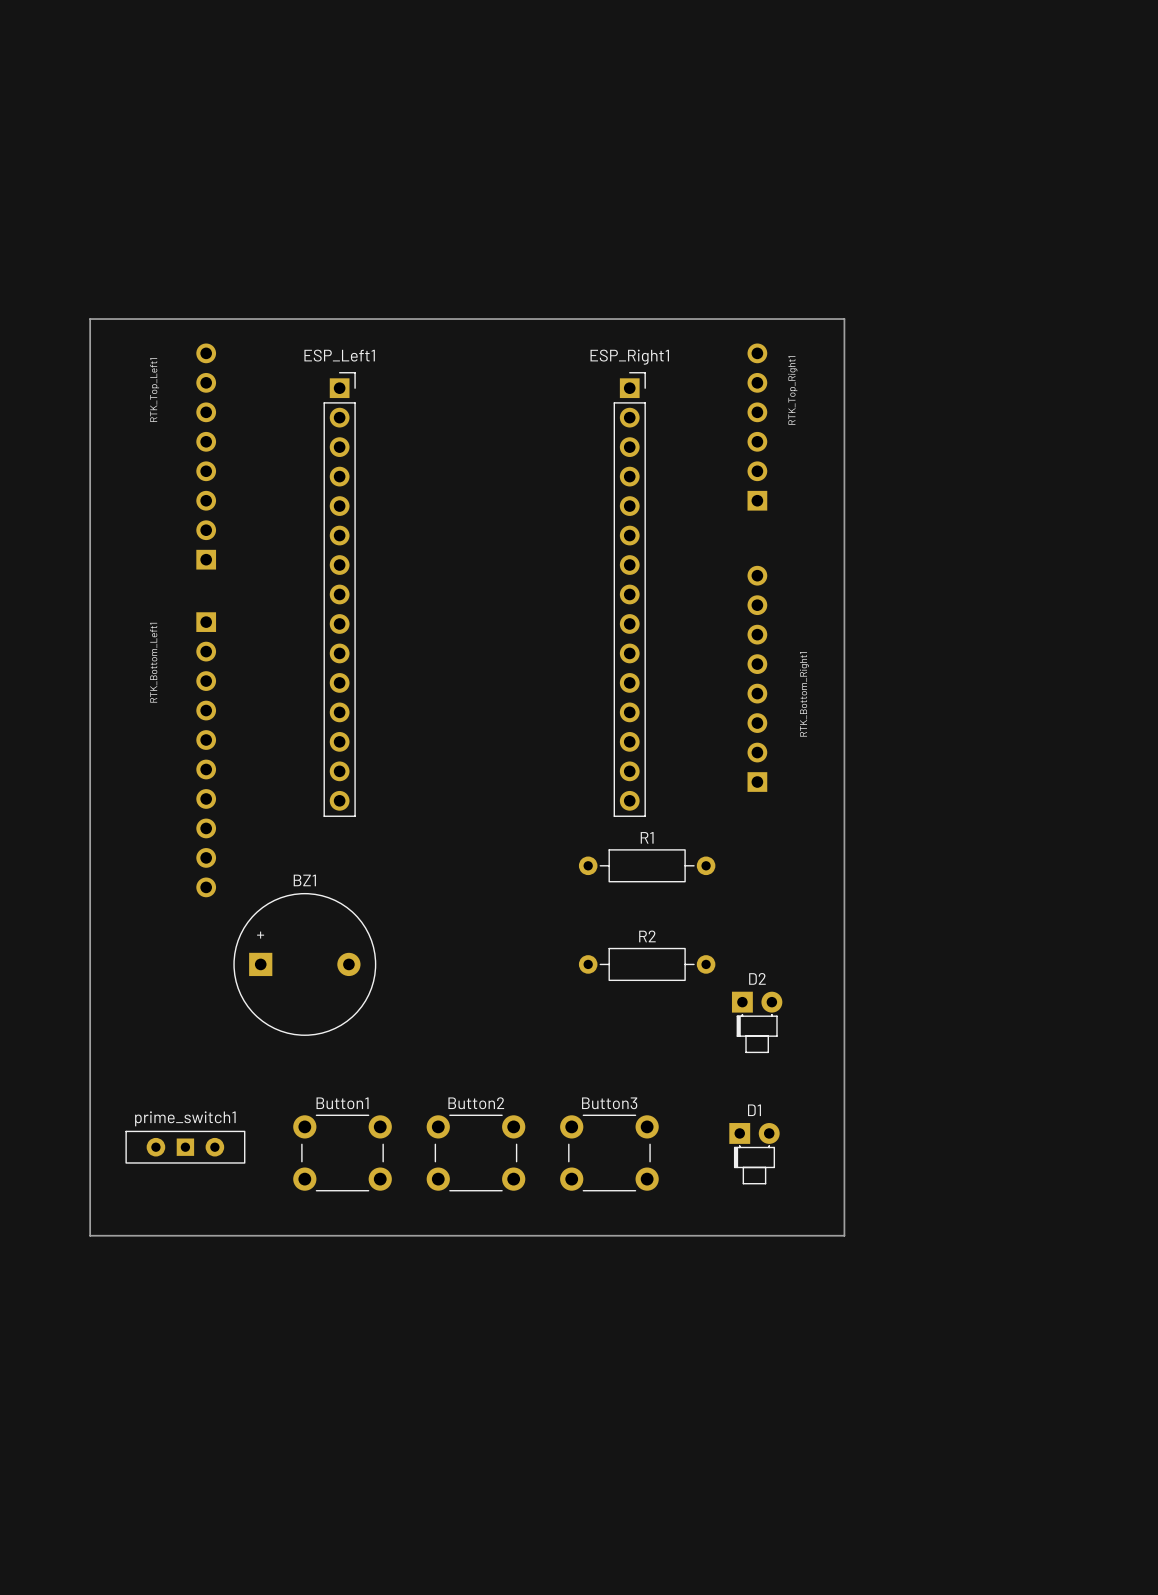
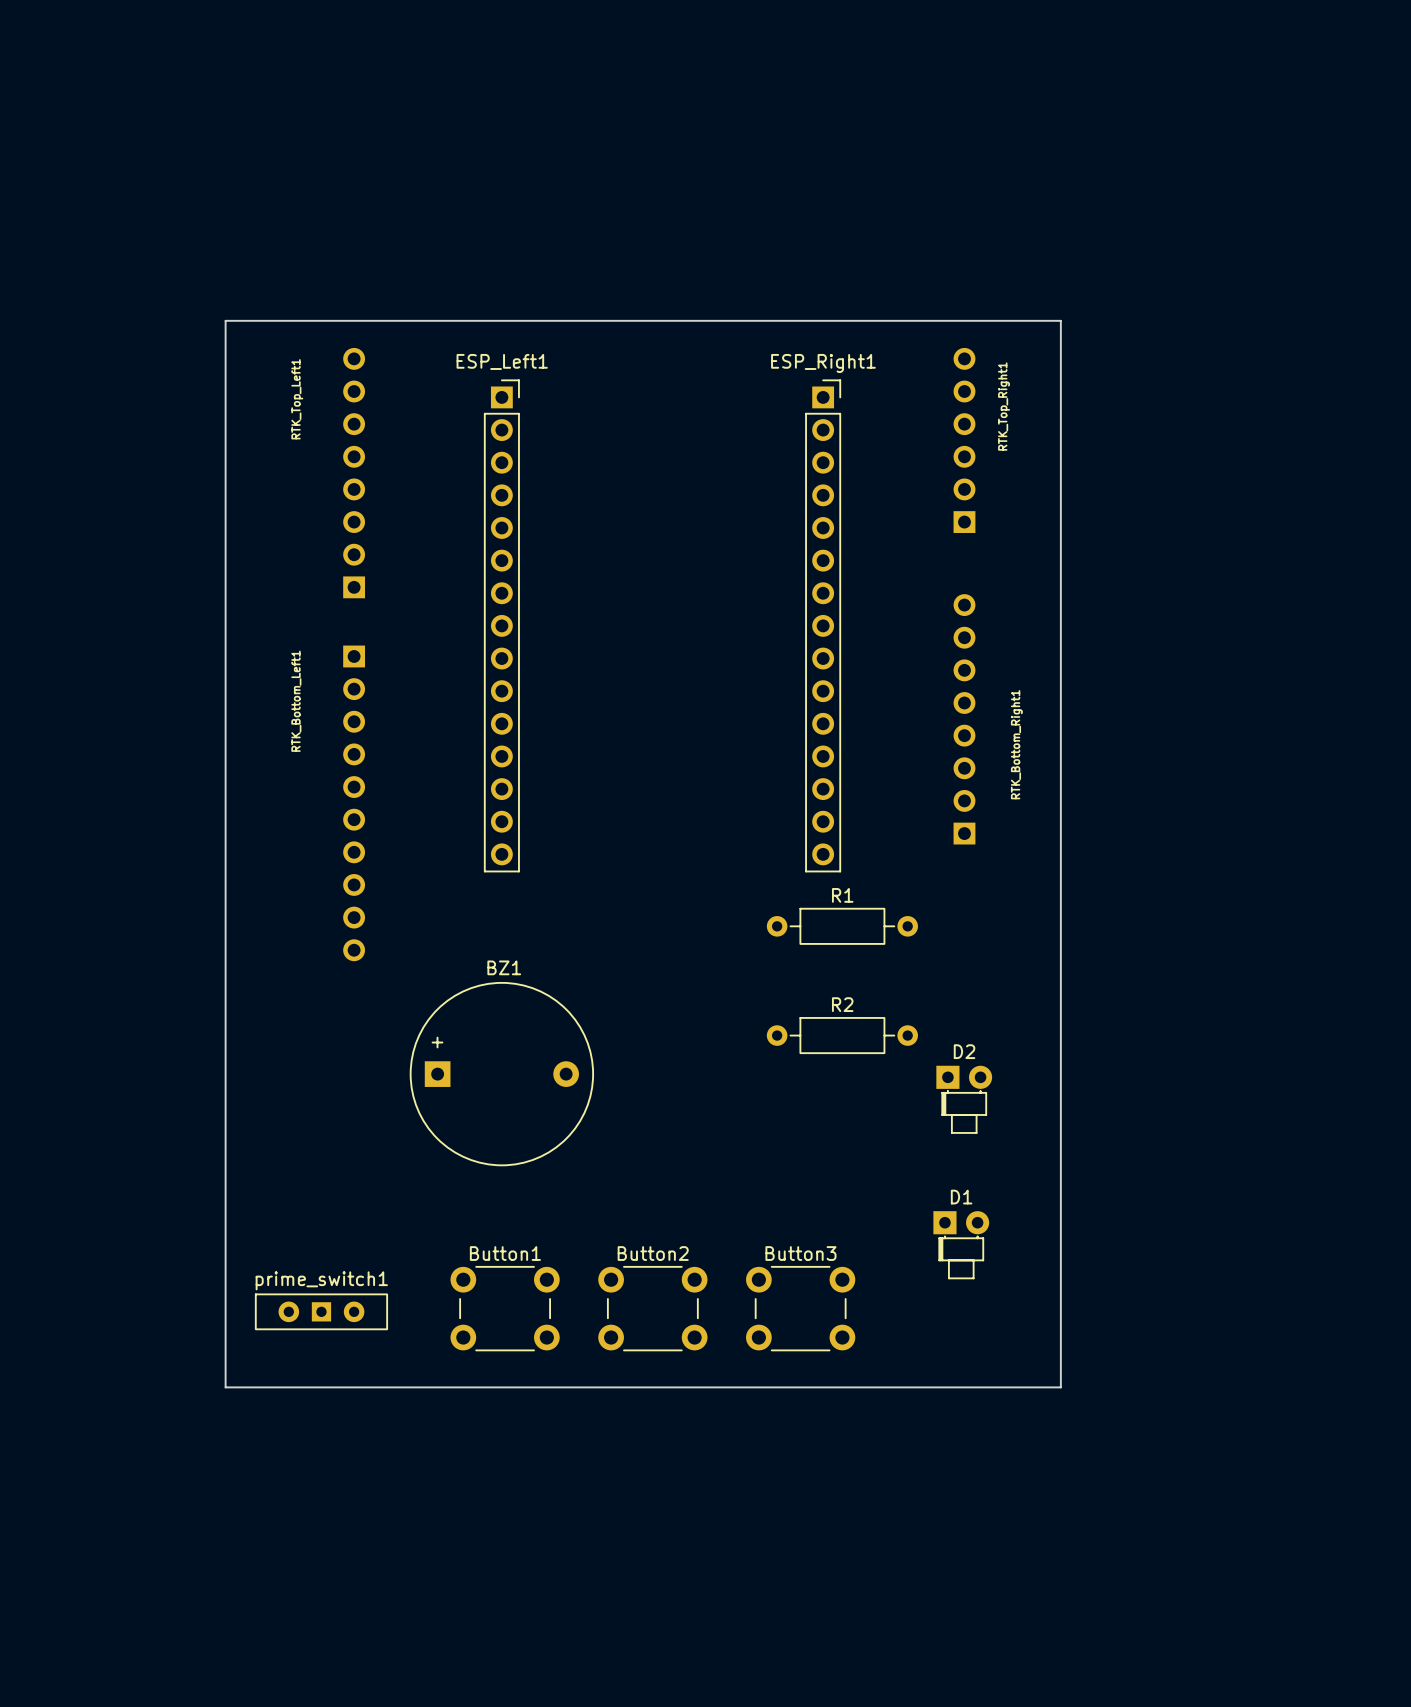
BZ1 footprint: [233, 892, 377, 1036] -> [409, 982, 594, 1167]
prime_switch1 position: (185, 1147) -> (321, 1311)
Button1 position: (342, 1153) -> (505, 1308)
Button2 position: (475, 1153) -> (652, 1308)
Button3 position: (609, 1153) -> (800, 1308)
board edge: (90, 1235) (844, 1235) -> (225, 1335) (225, 1387) (1060, 1387) (1060, 1335)

